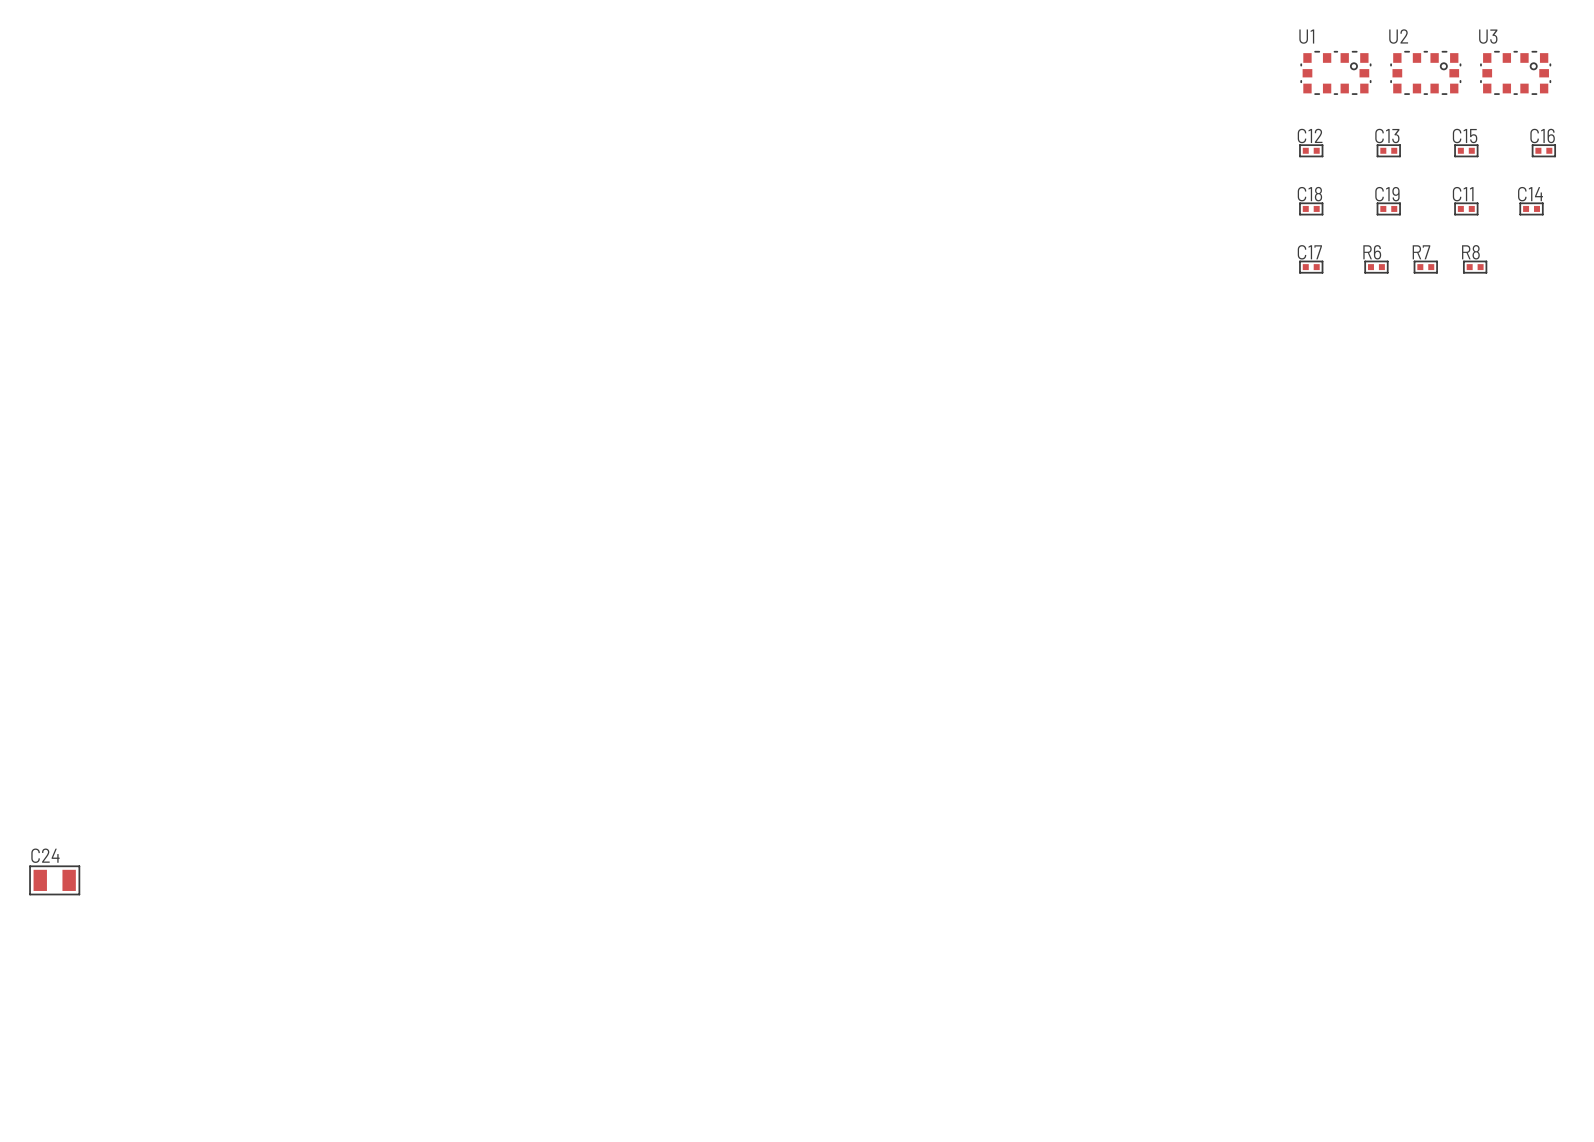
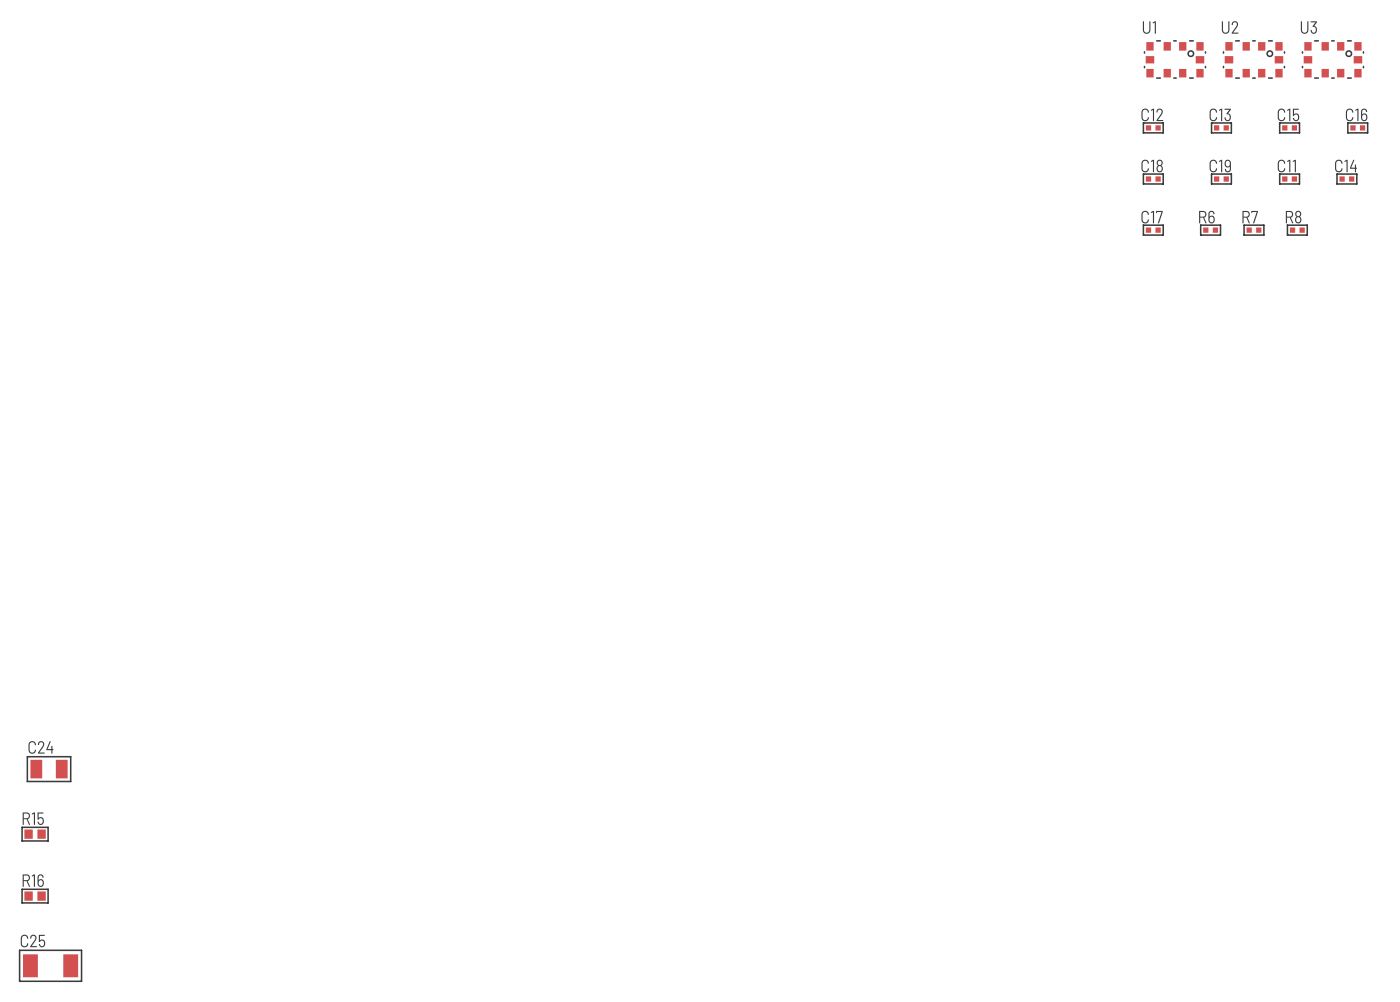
R15: none -> (35, 834)
R16: none -> (35, 896)
C25: none -> (50, 965)

